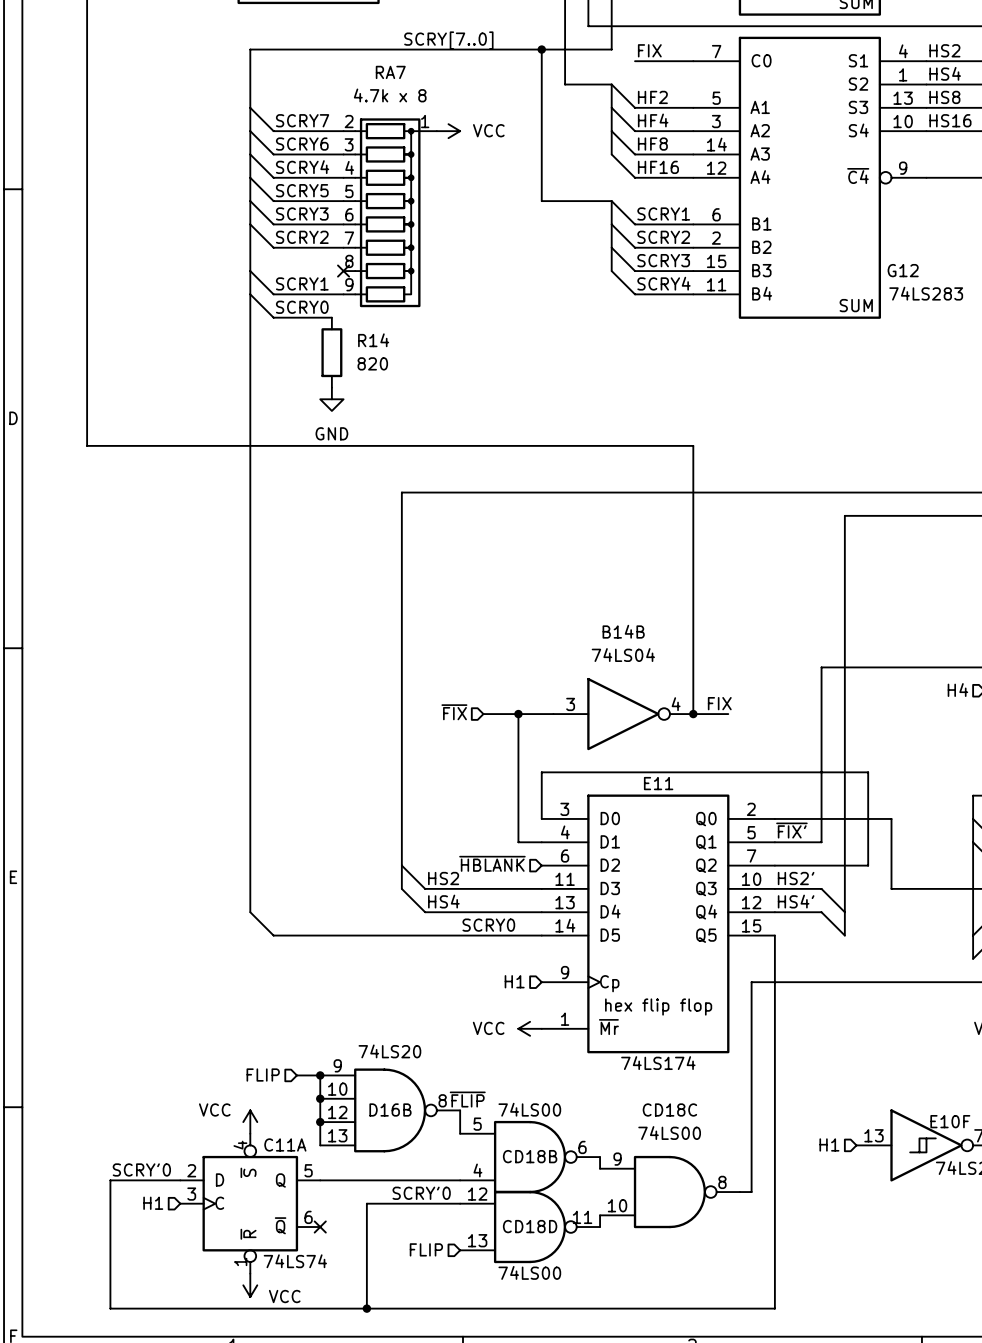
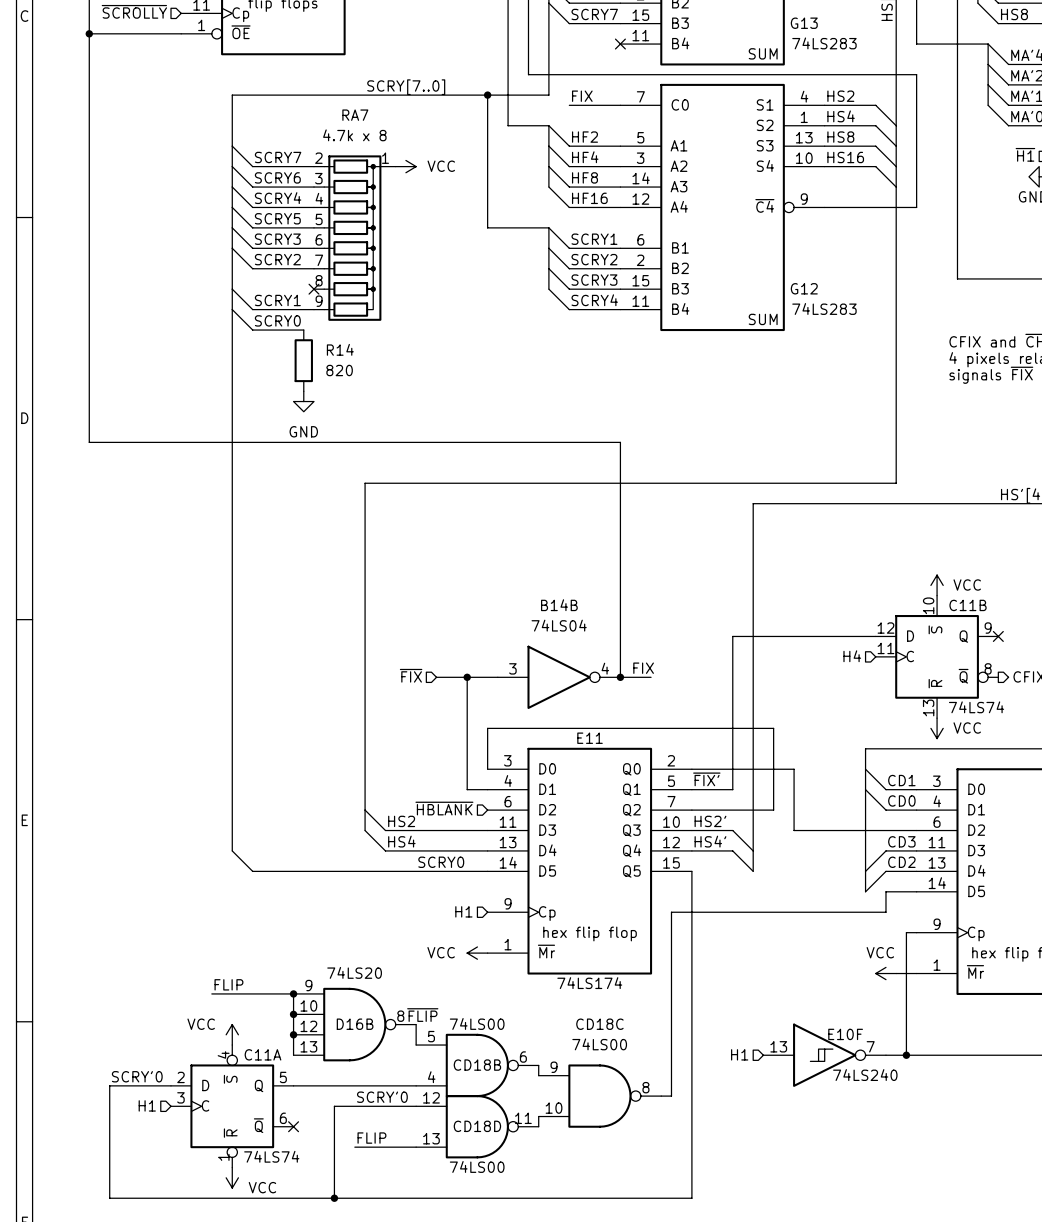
label: none -> FLIP (228, 984)
wire: none -> (211, 993) (273, 993)
hierarchical label: FLIP (263, 1075) -> none
label: none -> FLIP (371, 1138)
hierarchical label: FLIP (426, 1249) -> none
wire: none -> (354, 1147) (416, 1147)

